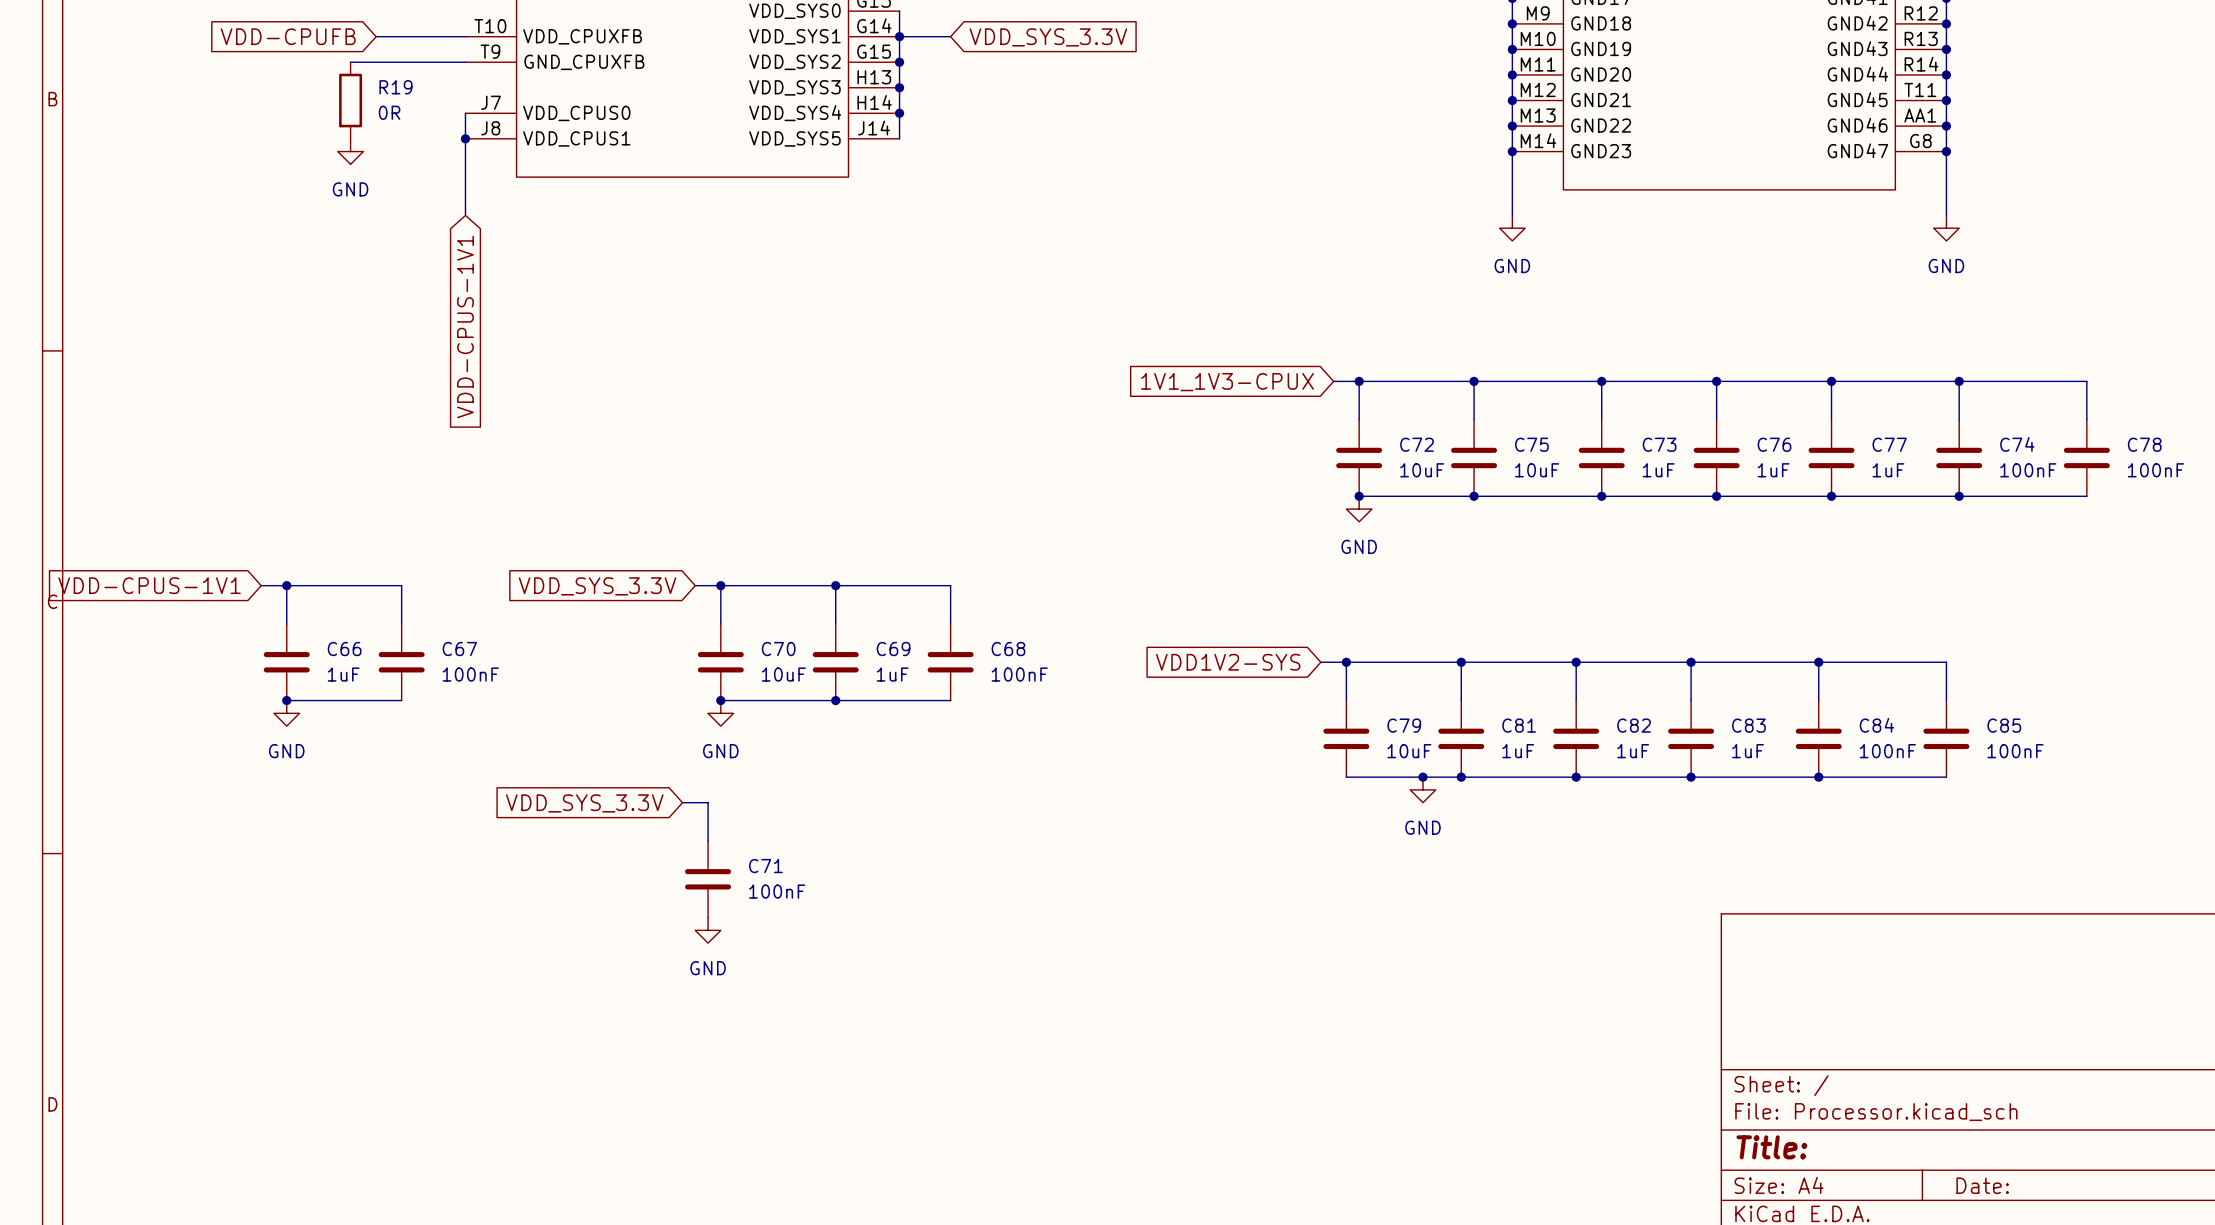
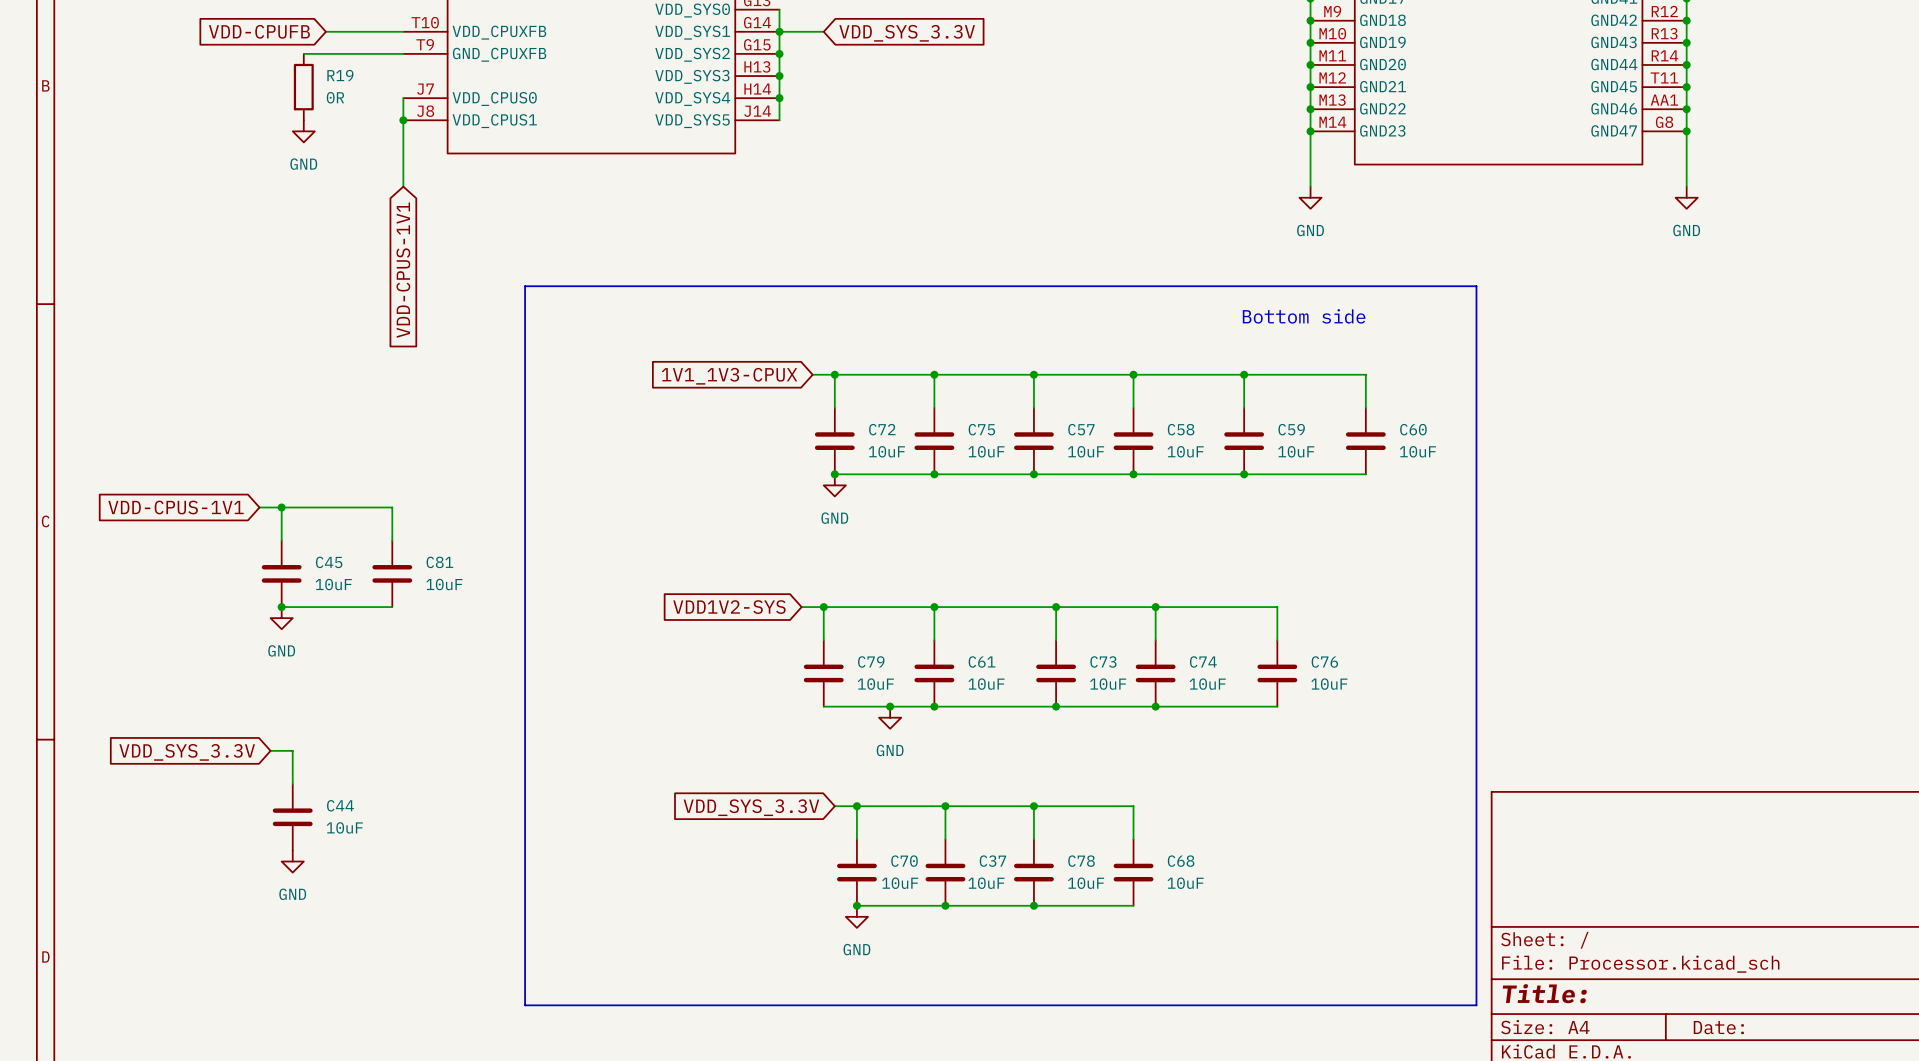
line: none -> (525, 286) (1476, 286) (1476, 1005) (525, 1005) (525, 286)
text: none -> Bottom side (1304, 316)
wire: (1333, 381) (2086, 381) (2086, 419) -> none
wire: (1359, 381) (1359, 419) -> (1033, 374) (1033, 407)
junction: (1359, 381) -> none
wire: (1474, 381) (1474, 419) -> (1133, 374) (1133, 407)
junction: (1474, 381) -> none
wire: (1601, 381) (1601, 419) -> (1244, 374) (1244, 407)
junction: (1601, 381) -> none
wire: (1716, 381) (1716, 419) -> none
junction: (1716, 381) -> none
wire: (1831, 381) (1831, 419) -> none
junction: (1831, 381) -> none
wire: (1959, 381) (1959, 419) -> none
junction: (1959, 381) -> none
global label: 1V1_1V3-CPUX (1227, 382) -> none
wire: none -> (812, 374) (1365, 374) (1365, 407)
junction: none -> (834, 374)
wire: none -> (934, 374) (934, 407)
junction: none -> (934, 374)
junction: none -> (1033, 374)
junction: none -> (1133, 374)
junction: none -> (1244, 374)
global label: none -> 1V1_1V3-CPUX (729, 376)
C72 position: (1359, 457) -> (834, 441)
C75 position: (1474, 457) -> (934, 441)
C73 position: (1601, 457) -> (1056, 673)
C76 position: (1716, 457) -> (1277, 673)
C77: 1uF (1831, 457) -> none
C74 position: (1959, 457) -> (1155, 673)
C78 position: (2086, 457) -> (1033, 872)
C73 value: 1uF (1658, 470) -> 10uF (1108, 684)
C76 value: 1uF (1773, 470) -> 10uF (1329, 684)
C74 value: 100nF (2028, 470) -> 10uF (1207, 684)
C78 value: 100nF (2155, 470) -> 10uF (1086, 883)
wire: (1359, 496) (2086, 496) -> none
junction: (1359, 496) -> none
junction: (1474, 496) -> none
junction: (1601, 496) -> none
junction: (1716, 496) -> none
junction: (1831, 496) -> none
junction: (1959, 496) -> none
C57: none -> 10uF (1033, 441)
C58: none -> 10uF (1133, 441)
power symbol: GND (1359, 509) -> none
C59: none -> 10uF (1244, 441)
C60: none -> 10uF (1365, 441)
wire: none -> (834, 474) (1365, 474)
junction: none -> (834, 474)
junction: none -> (934, 474)
junction: none -> (1033, 474)
junction: none -> (1133, 474)
junction: none -> (1244, 474)
power symbol: none -> GND (834, 485)
global label position: VDD-CPUS-1V1 (149, 585) -> VDD-CPUS-1V1 (176, 507)
wire: (261, 585) (299, 585) -> none
wire: (286, 585) (286, 623) -> (281, 507) (281, 540)
junction position: (286, 585) -> (281, 507)
wire: (401, 585) (401, 623) -> (348, 507) (392, 507) (392, 540)
wire: (695, 585) (950, 585) (950, 623) -> none
wire: (720, 585) (720, 623) -> none
junction: (720, 585) -> none
wire: (835, 585) (835, 623) -> (834, 374) (834, 407)
junction: (835, 585) -> none
global label: VDD_SYS_3.3V (597, 586) -> none
C66: 1uF (286, 662) -> none
C45: none -> 10uF (281, 573)
C67: 100nF (401, 662) -> none
C70 position: (720, 662) -> (856, 872)
C69: 1uF (835, 662) -> none
C68 position: (950, 662) -> (1133, 872)
global label: VDD1V2-SYS (1228, 662) -> none
wire: (1320, 662) (1946, 662) (1946, 700) -> none
wire: (1346, 662) (1346, 700) -> (1056, 607) (1056, 640)
junction position: (1346, 662) -> (1155, 607)
wire: (1461, 662) (1461, 700) -> (1155, 607) (1155, 640)
junction: (1461, 662) -> none
wire: (1576, 662) (1576, 700) -> none
junction: (1576, 662) -> none
wire: (1691, 662) (1691, 700) -> none
junction: (1691, 662) -> none
wire: (1818, 662) (1818, 700) -> none
junction: (1818, 662) -> none
C70 value position: 10uF (783, 674) -> 10uF (900, 883)
C68 value: 100nF (1019, 674) -> 10uF (1185, 883)
wire: (286, 700) (325, 700) -> none
junction position: (286, 700) -> (281, 607)
wire: none -> (348, 607) (392, 607)
wire: (720, 700) (925, 700) -> none
junction: (720, 700) -> none
global label: none -> VDD1V2-SYS (729, 607)
junction: (835, 700) -> none
junction: none -> (823, 607)
wire: none -> (934, 607) (934, 640)
junction: none -> (934, 607)
junction: none -> (1056, 607)
power symbol position: GND (286, 713) -> GND (281, 618)
power symbol: GND (720, 713) -> none
wire: none -> (823, 640) (823, 607) (1277, 607) (1277, 640)
C79 position: (1346, 738) -> (823, 673)
C81 position: (1461, 738) -> (392, 573)
C82: 1uF (1576, 738) -> none
C83: 1uF (1691, 738) -> none
C84: 100nF (1818, 738) -> none
C85: 100nF (1946, 738) -> none
C81 value: 1uF (1518, 751) -> 10uF (444, 584)
C61: none -> 10uF (934, 673)
wire: (1346, 777) (1946, 777) -> none
junction: (1422, 777) -> none
junction: (1461, 777) -> none
junction: (1576, 777) -> none
junction: (1691, 777) -> none
junction: (1818, 777) -> none
power symbol: GND (1422, 789) -> none
wire: (682, 802) (708, 802) (708, 840) -> none
global label: VDD_SYS_3.3V (584, 803) -> none
wire: none -> (823, 706) (1277, 706)
junction: none -> (890, 706)
junction: none -> (934, 706)
junction: none -> (1056, 706)
junction: none -> (1155, 706)
power symbol: none -> GND (890, 717)
wire: none -> (270, 750) (292, 750) (292, 784)
global label: none -> VDD_SYS_3.3V (187, 752)
C71: 100nF (708, 879) -> none
power symbol: GND (708, 930) -> none
wire: none -> (834, 806) (1133, 806) (1133, 839)
wire: none -> (856, 806) (856, 839)
junction: none -> (856, 806)
wire: none -> (945, 806) (945, 839)
junction: none -> (945, 806)
wire: none -> (1033, 806) (1033, 839)
junction: none -> (1033, 806)
global label: none -> VDD_SYS_3.3V (751, 807)
C44: none -> 10uF (292, 817)
power symbol: none -> GND (292, 861)
C37: none -> 10uF (945, 872)
wire: none -> (856, 905) (1133, 905)
junction: none -> (856, 905)
junction: none -> (945, 905)
junction: none -> (1033, 905)
power symbol: none -> GND (856, 916)

